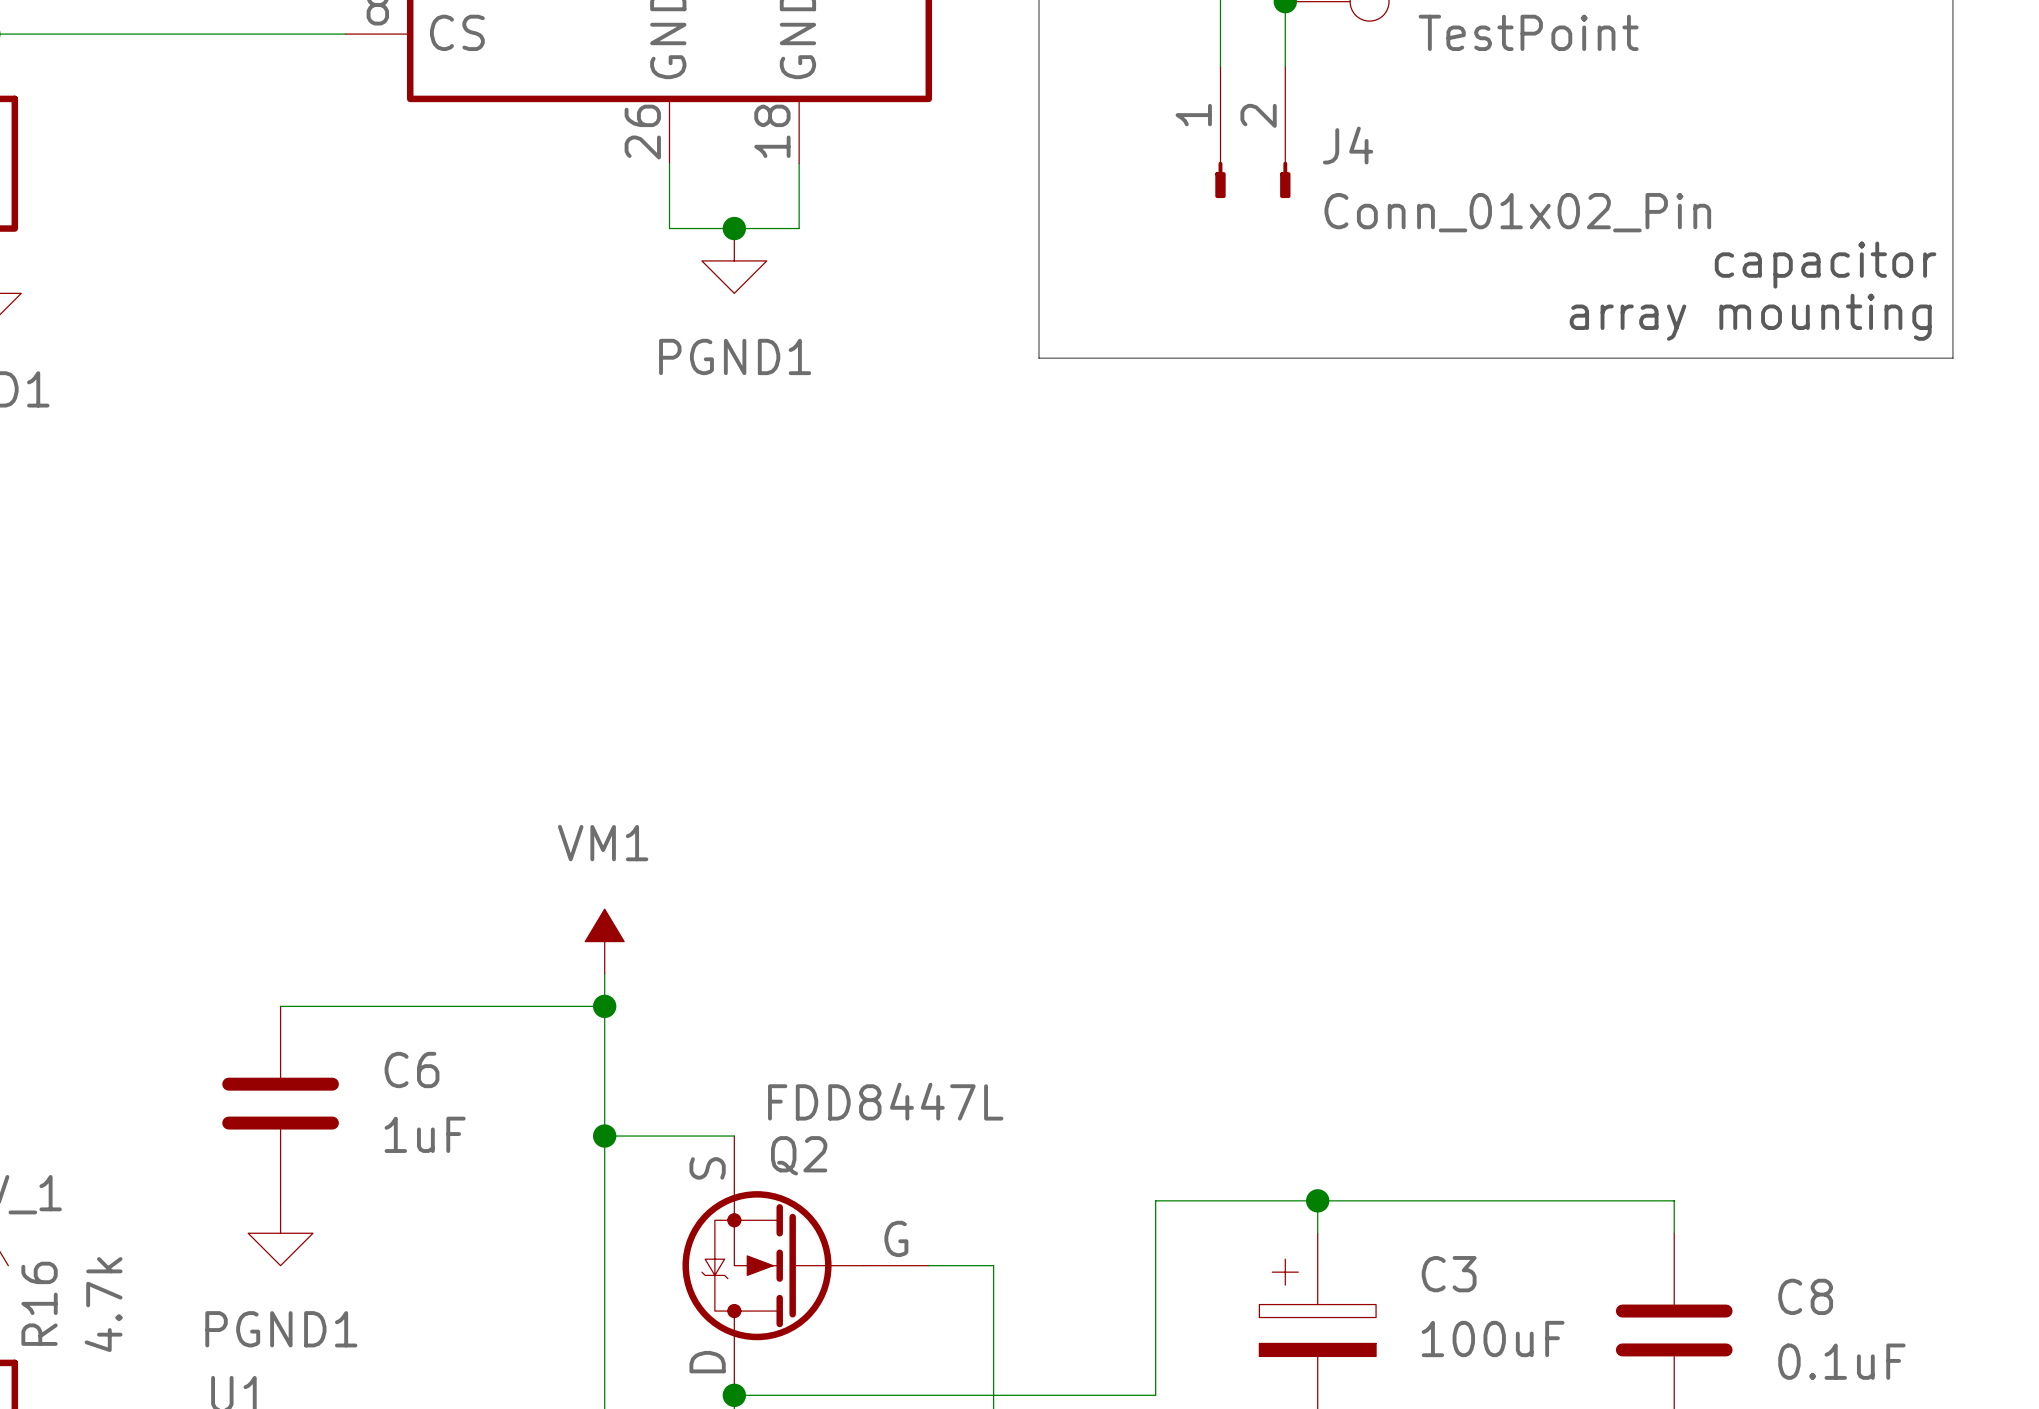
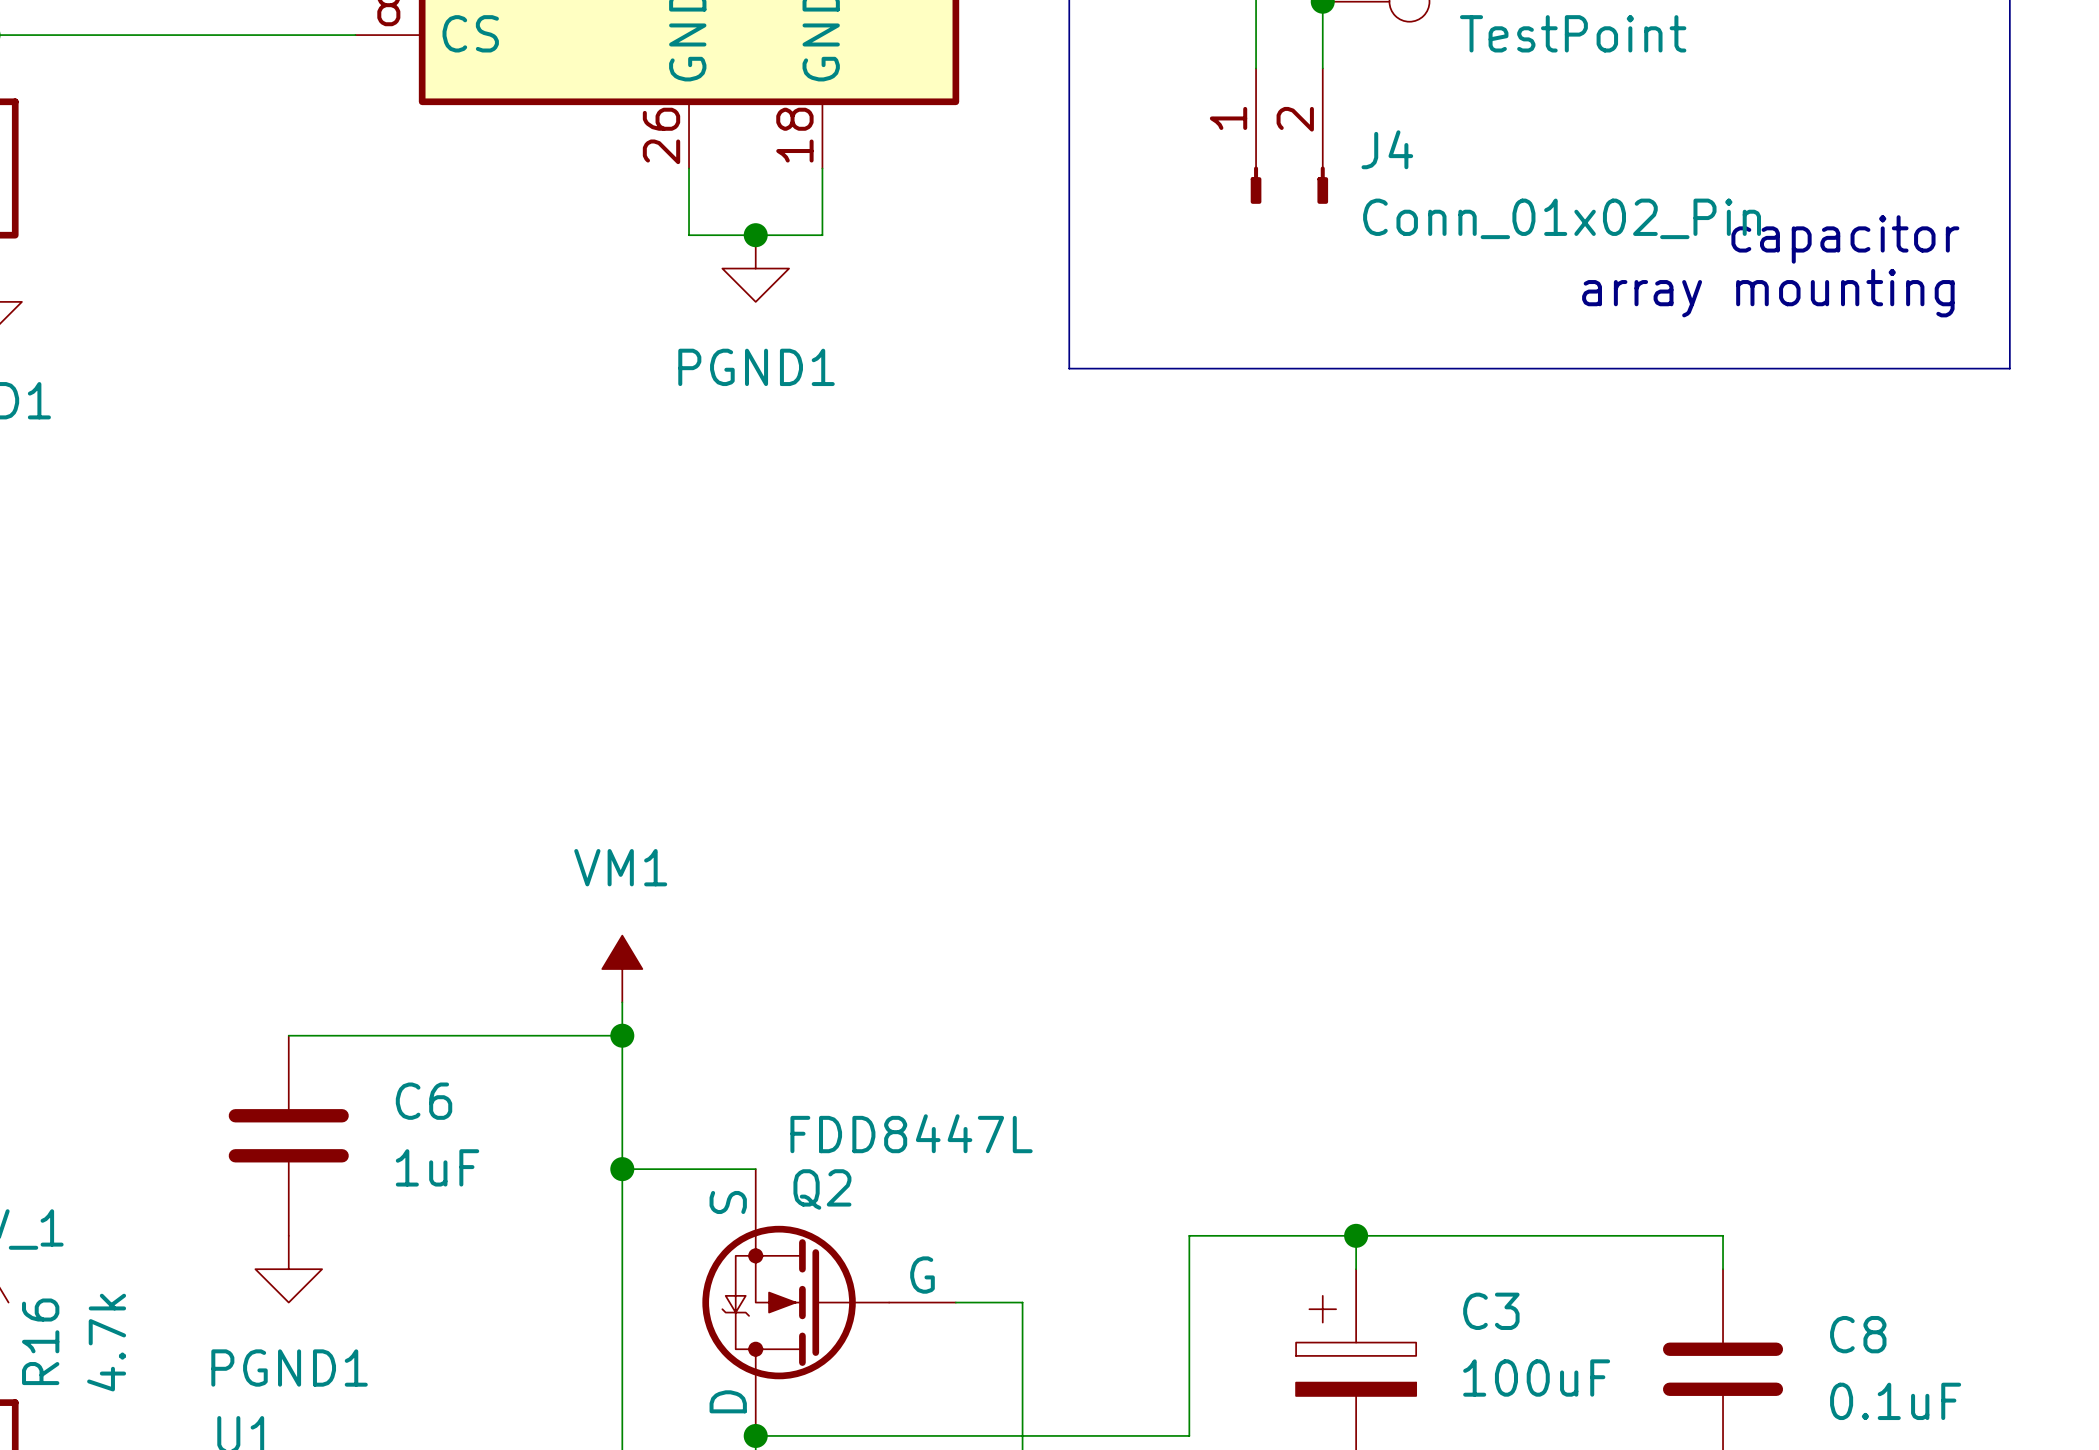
text position: capacitor (1825, 265) -> capacitor (1845, 239)
text position: array mounting (1750, 317) -> array mounting (1768, 293)

